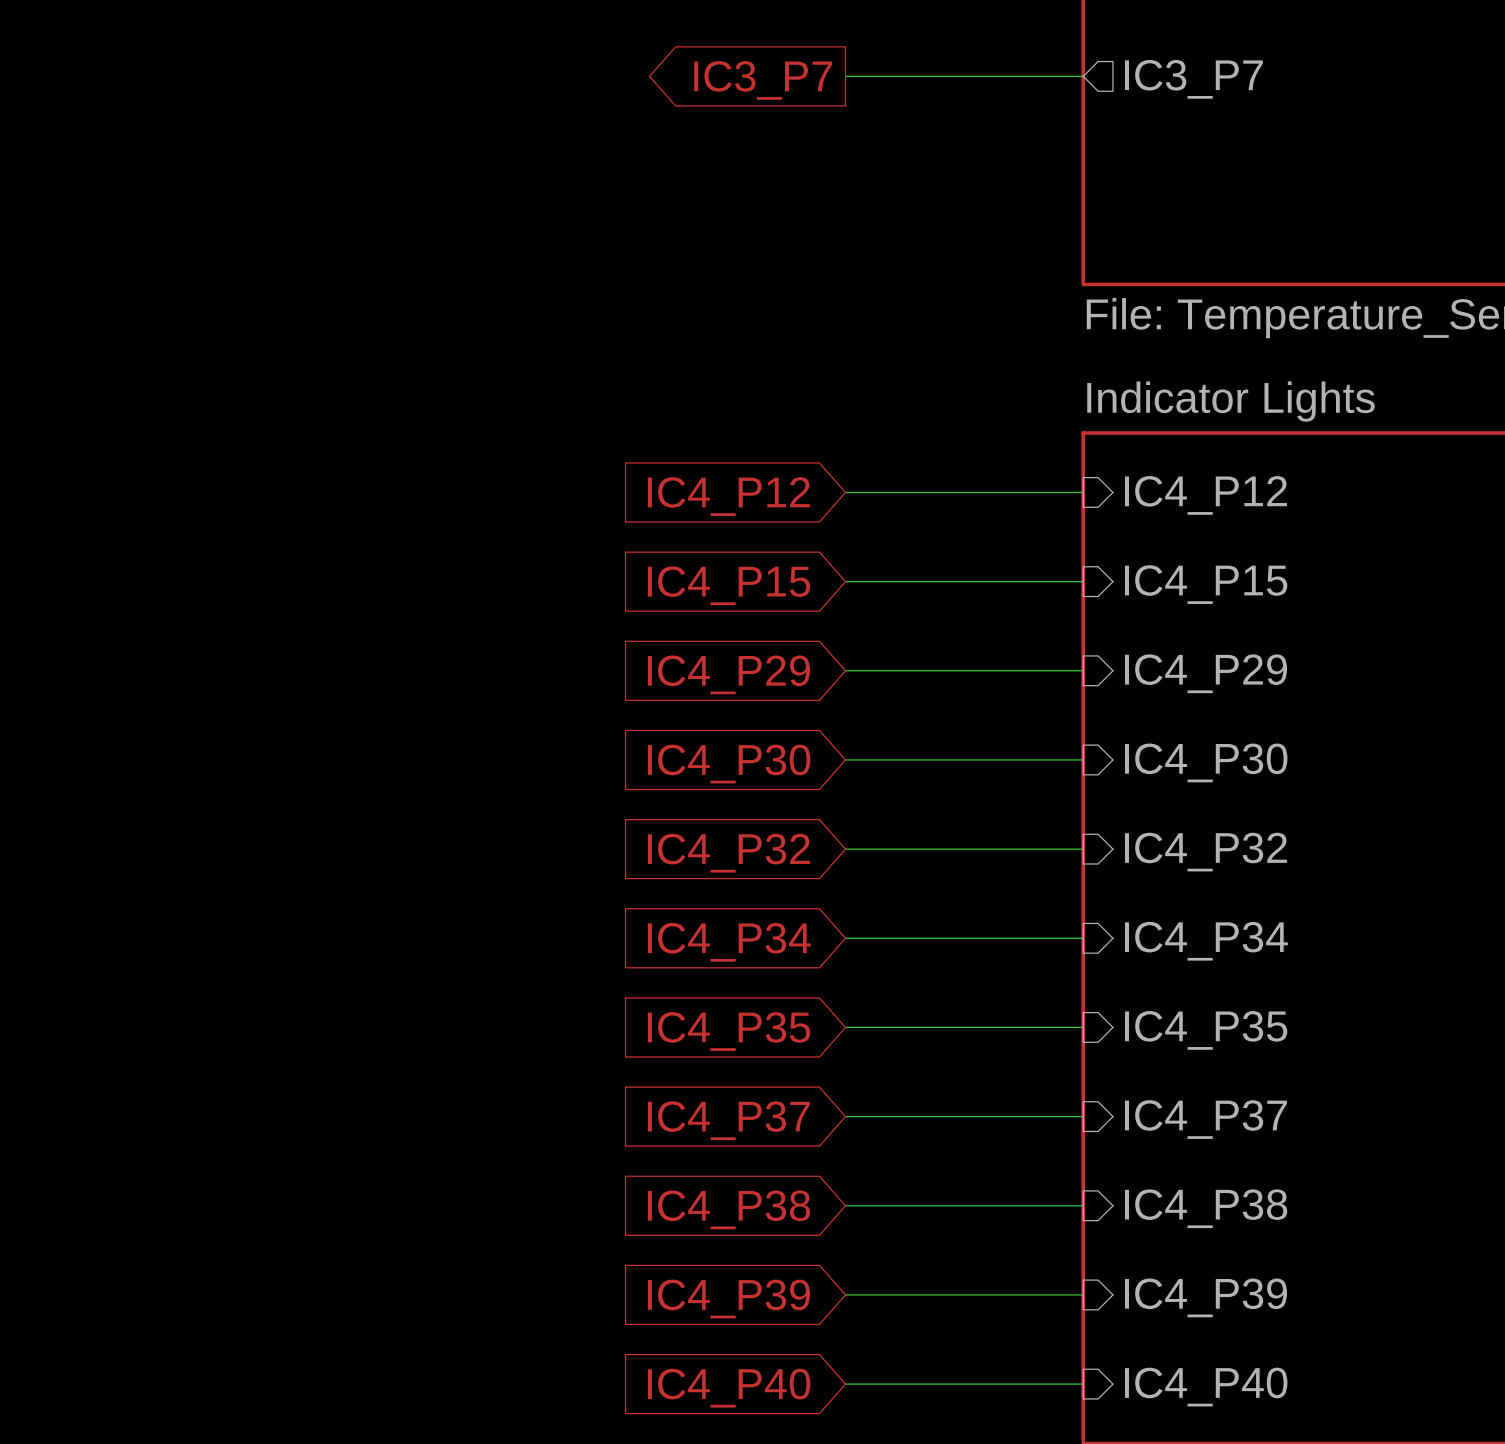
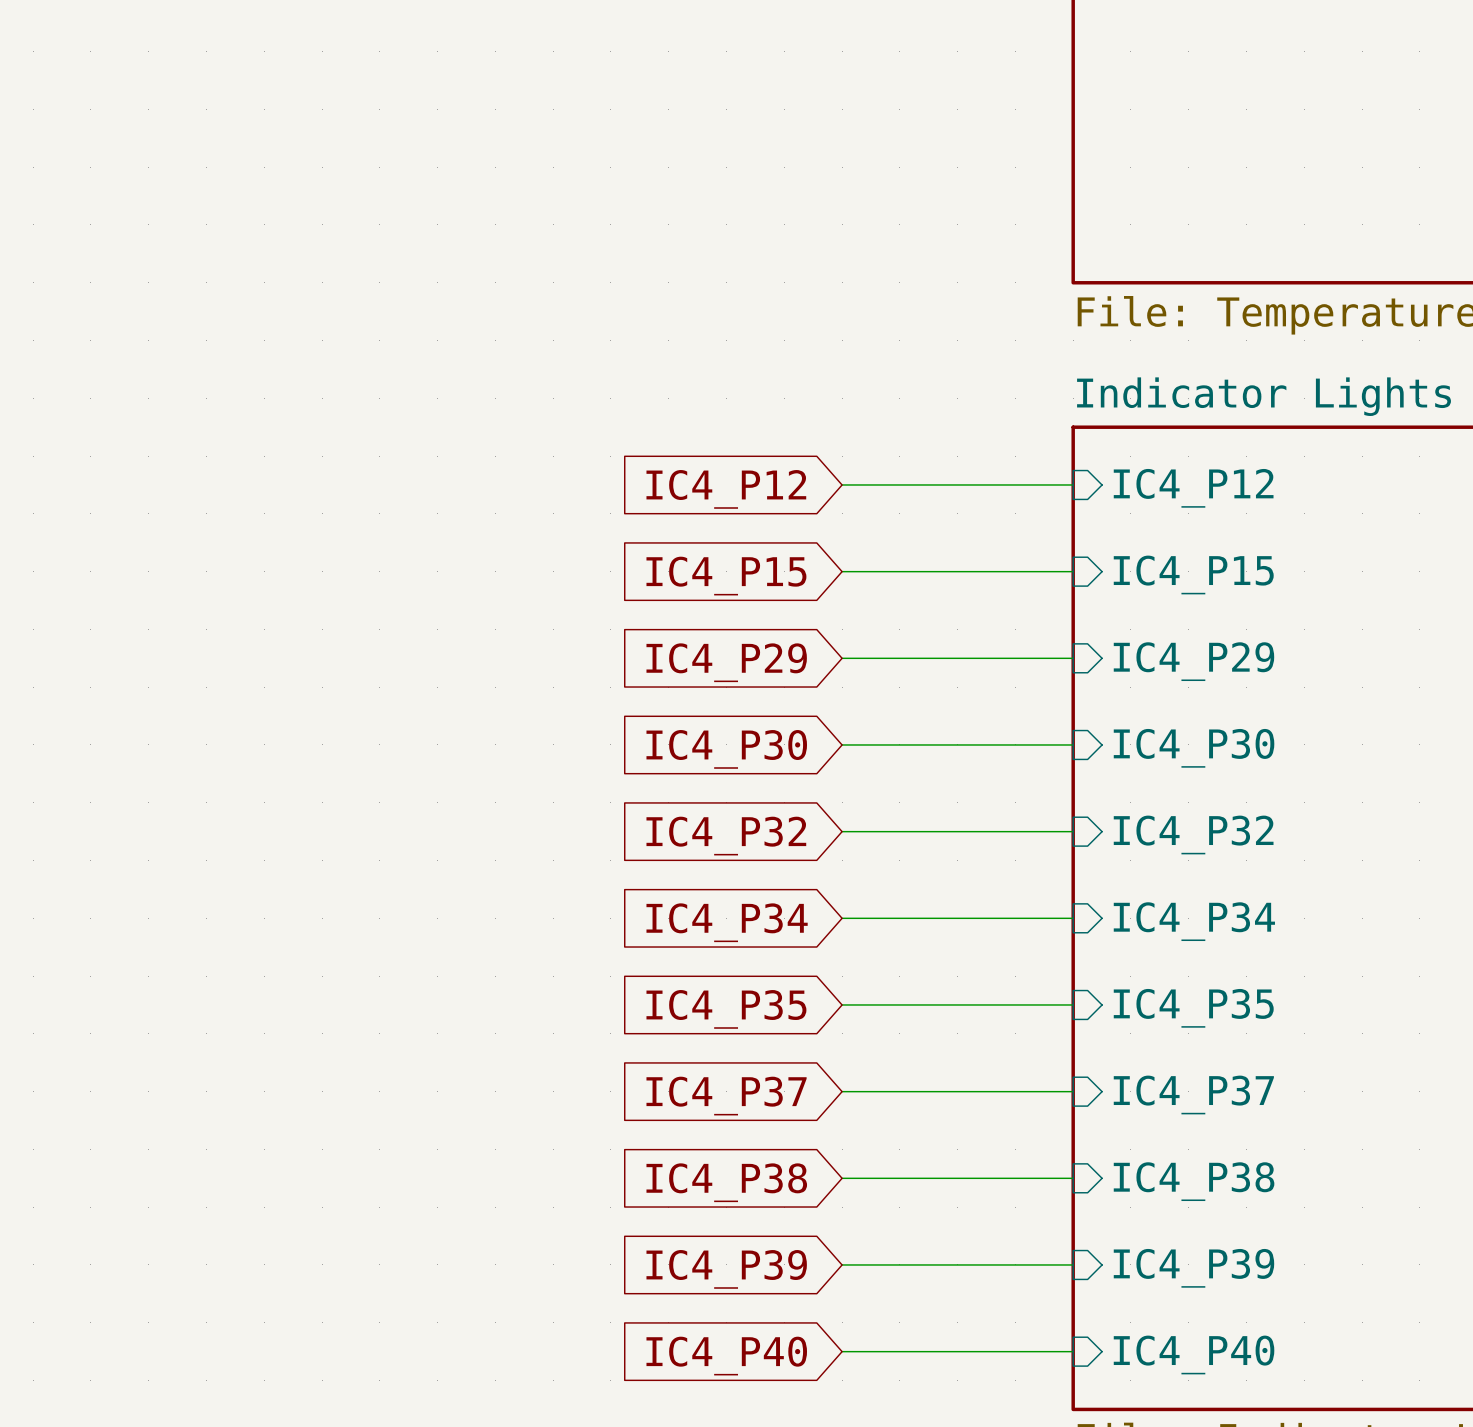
wire: (845, 76) (1083, 76) -> none
sheet pin: IC3_P7 (1193, 79) -> none
global label: IC3_P7 (763, 80) -> none

